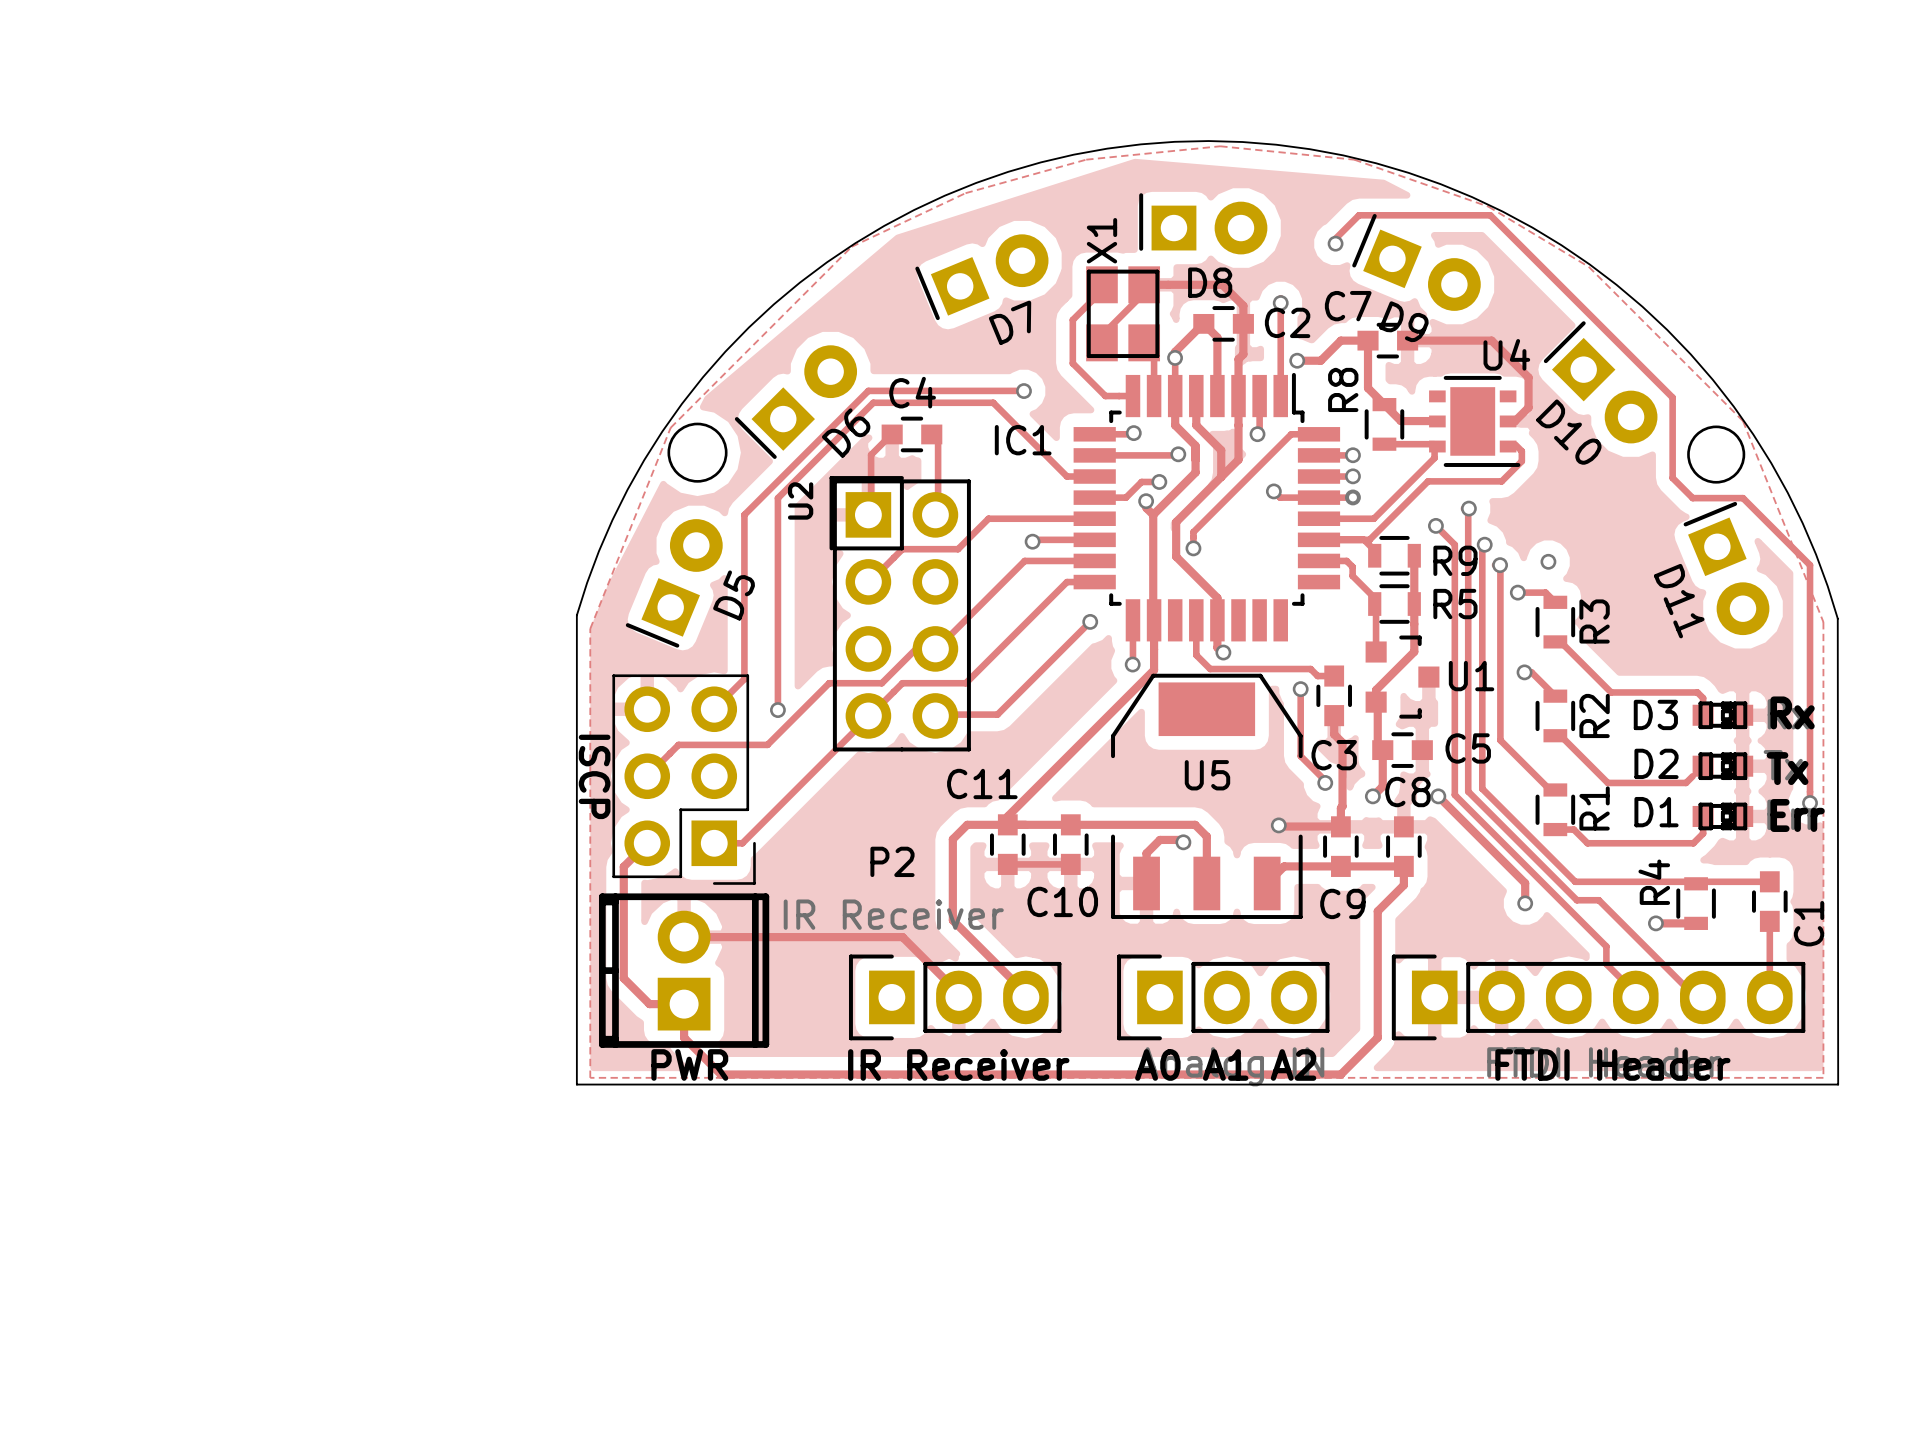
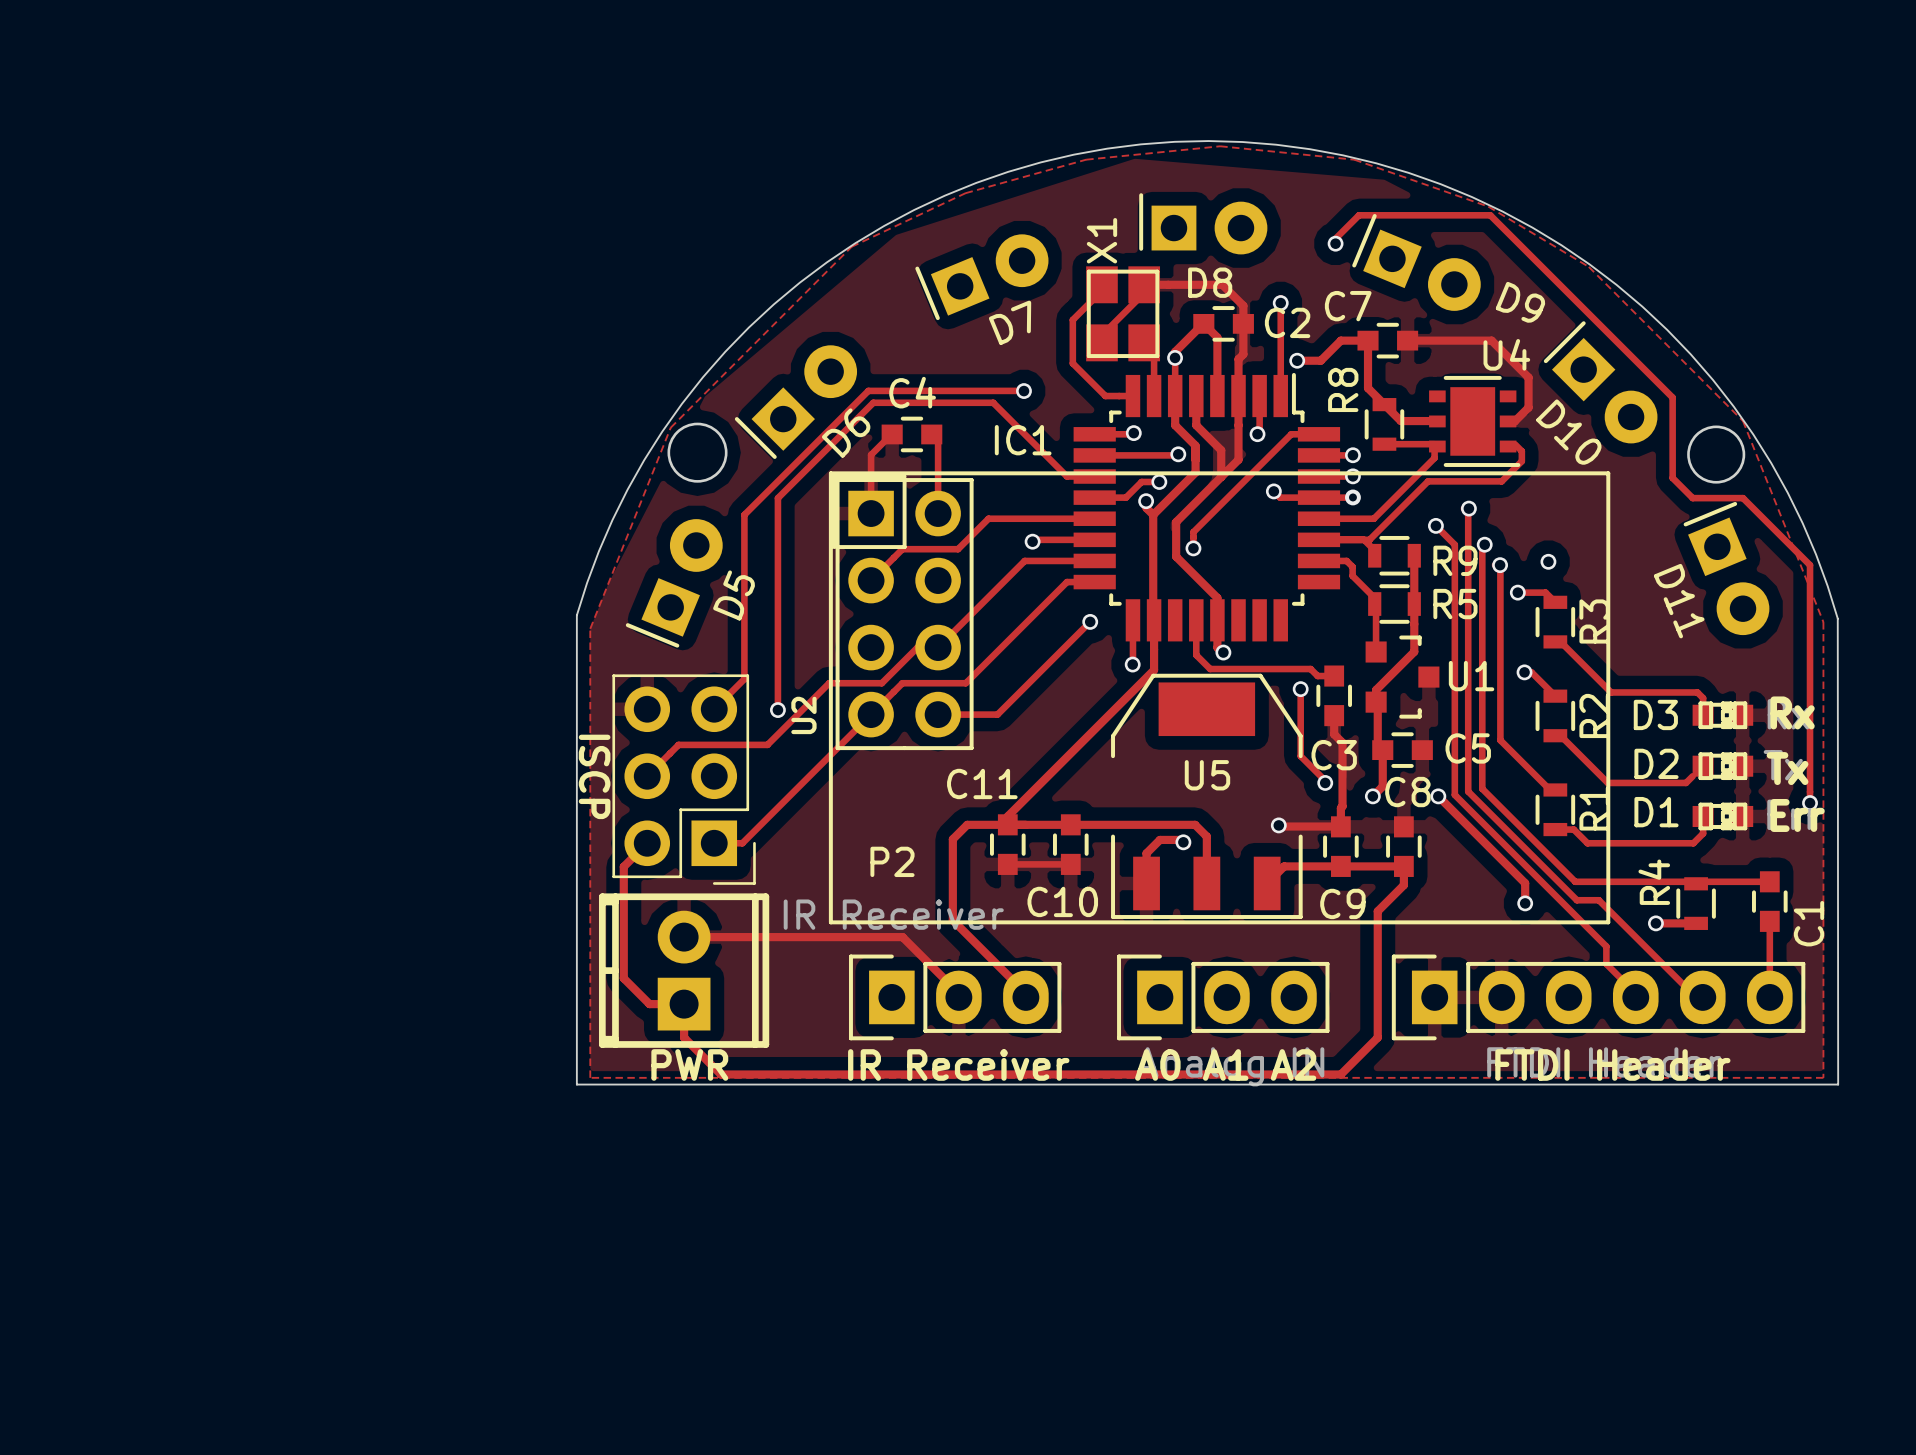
D9 name position: D9 (1404, 321) -> D9 (1520, 302)
U2 footprint: [829, 476, 971, 752] -> [828, 471, 1611, 925]
U2 name position: U2 (800, 500) -> U2 (803, 715)

